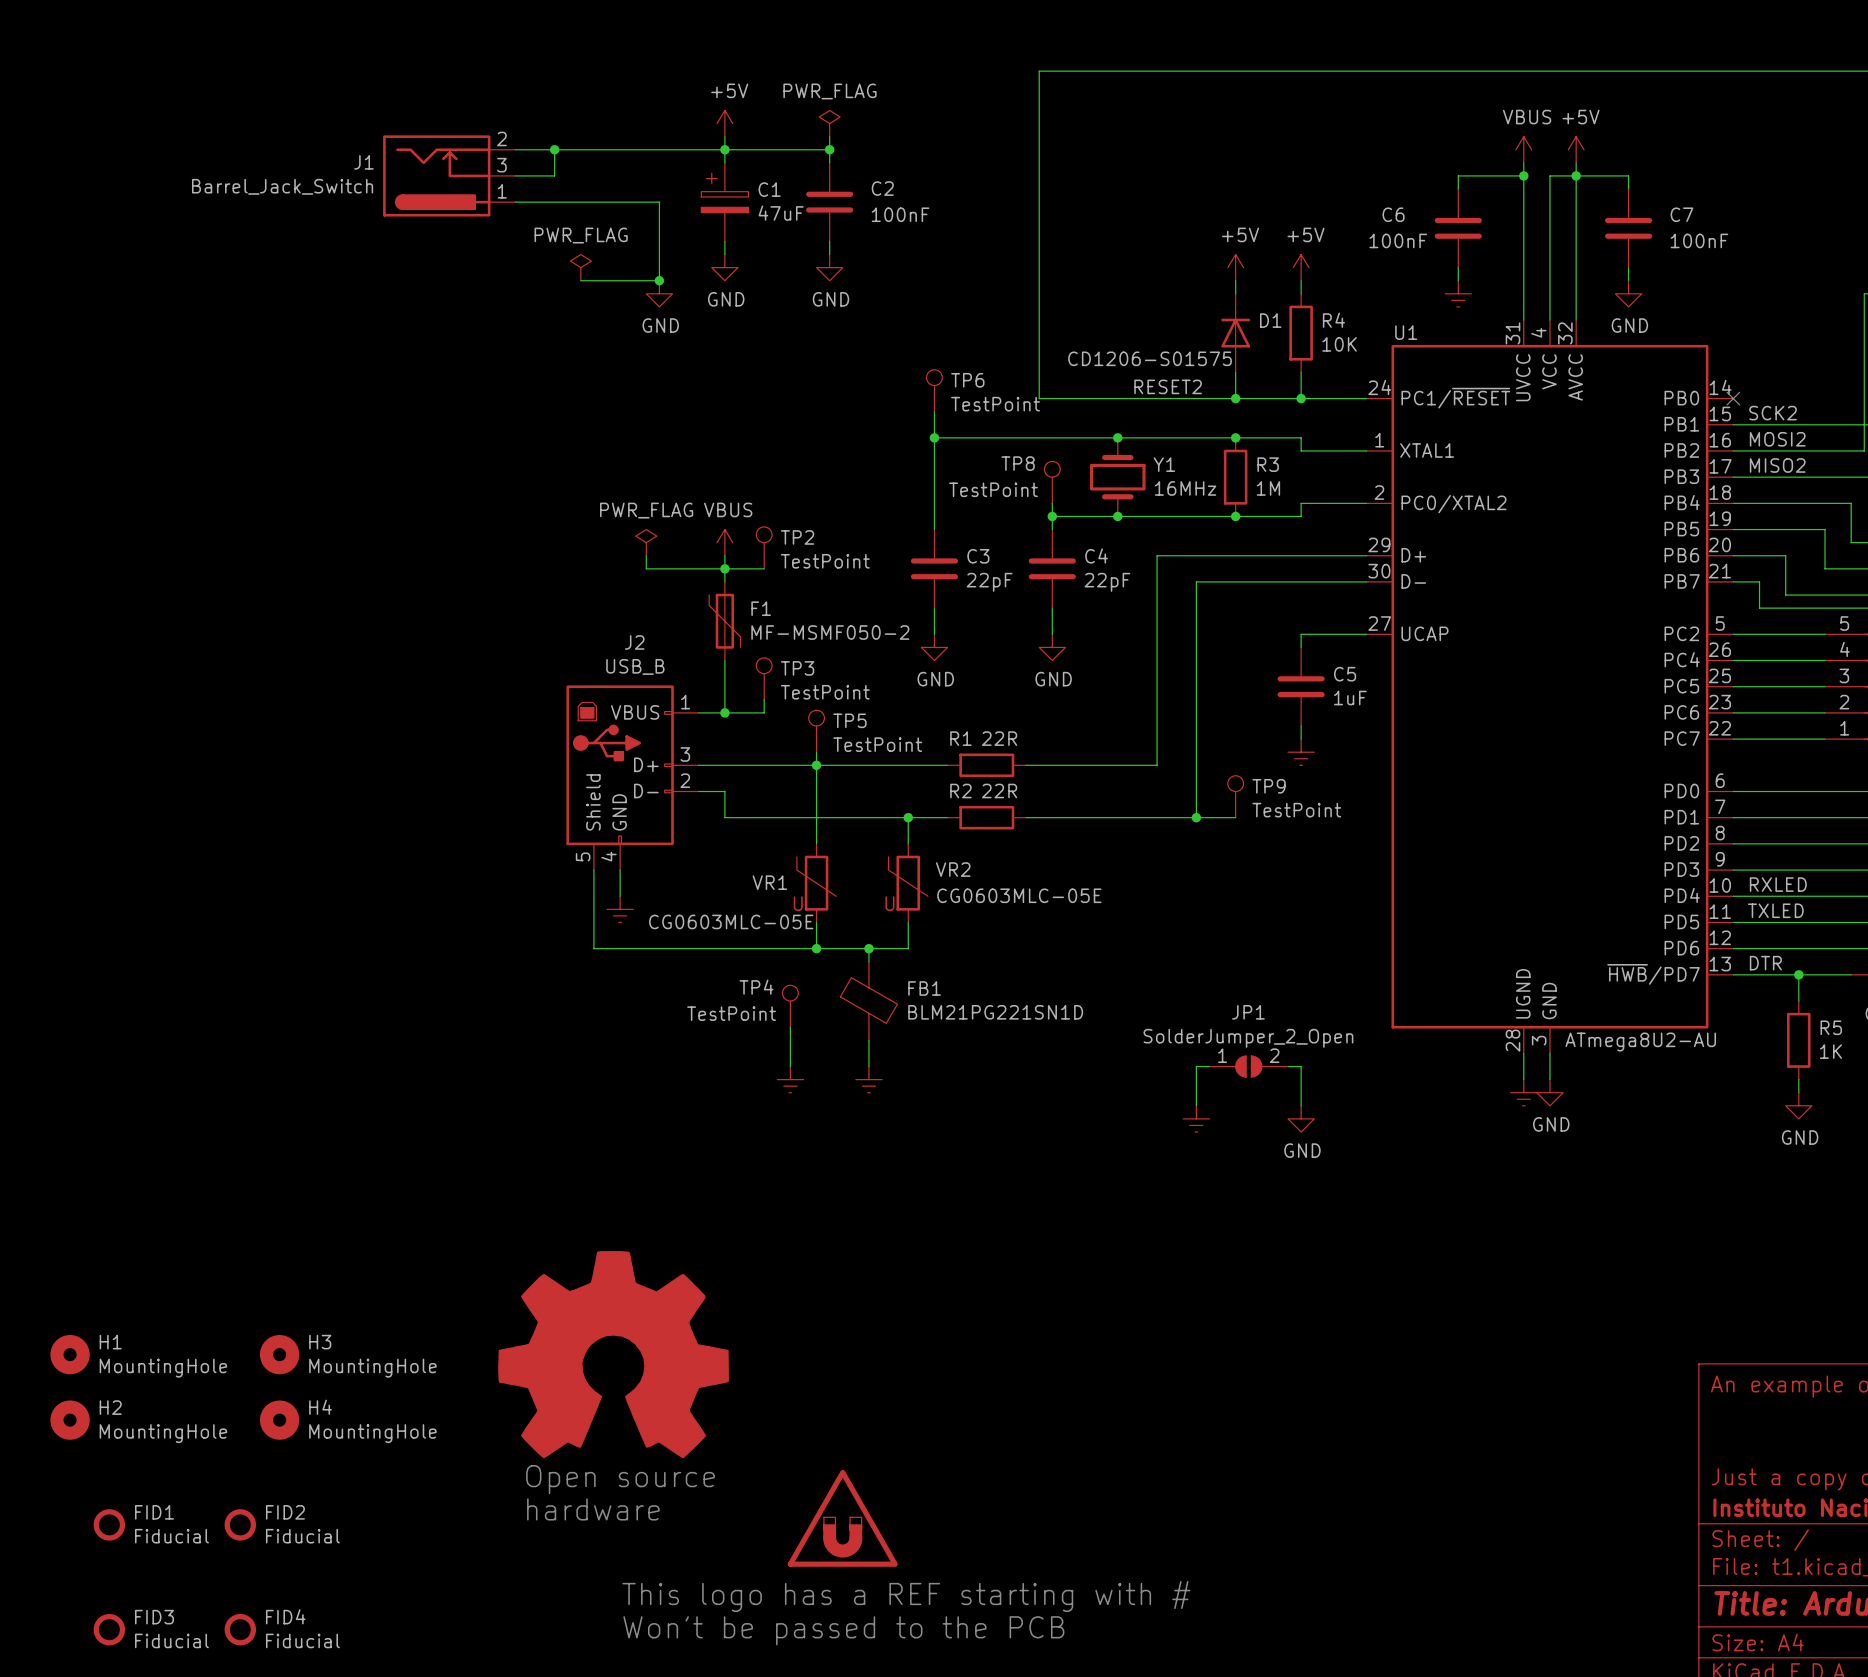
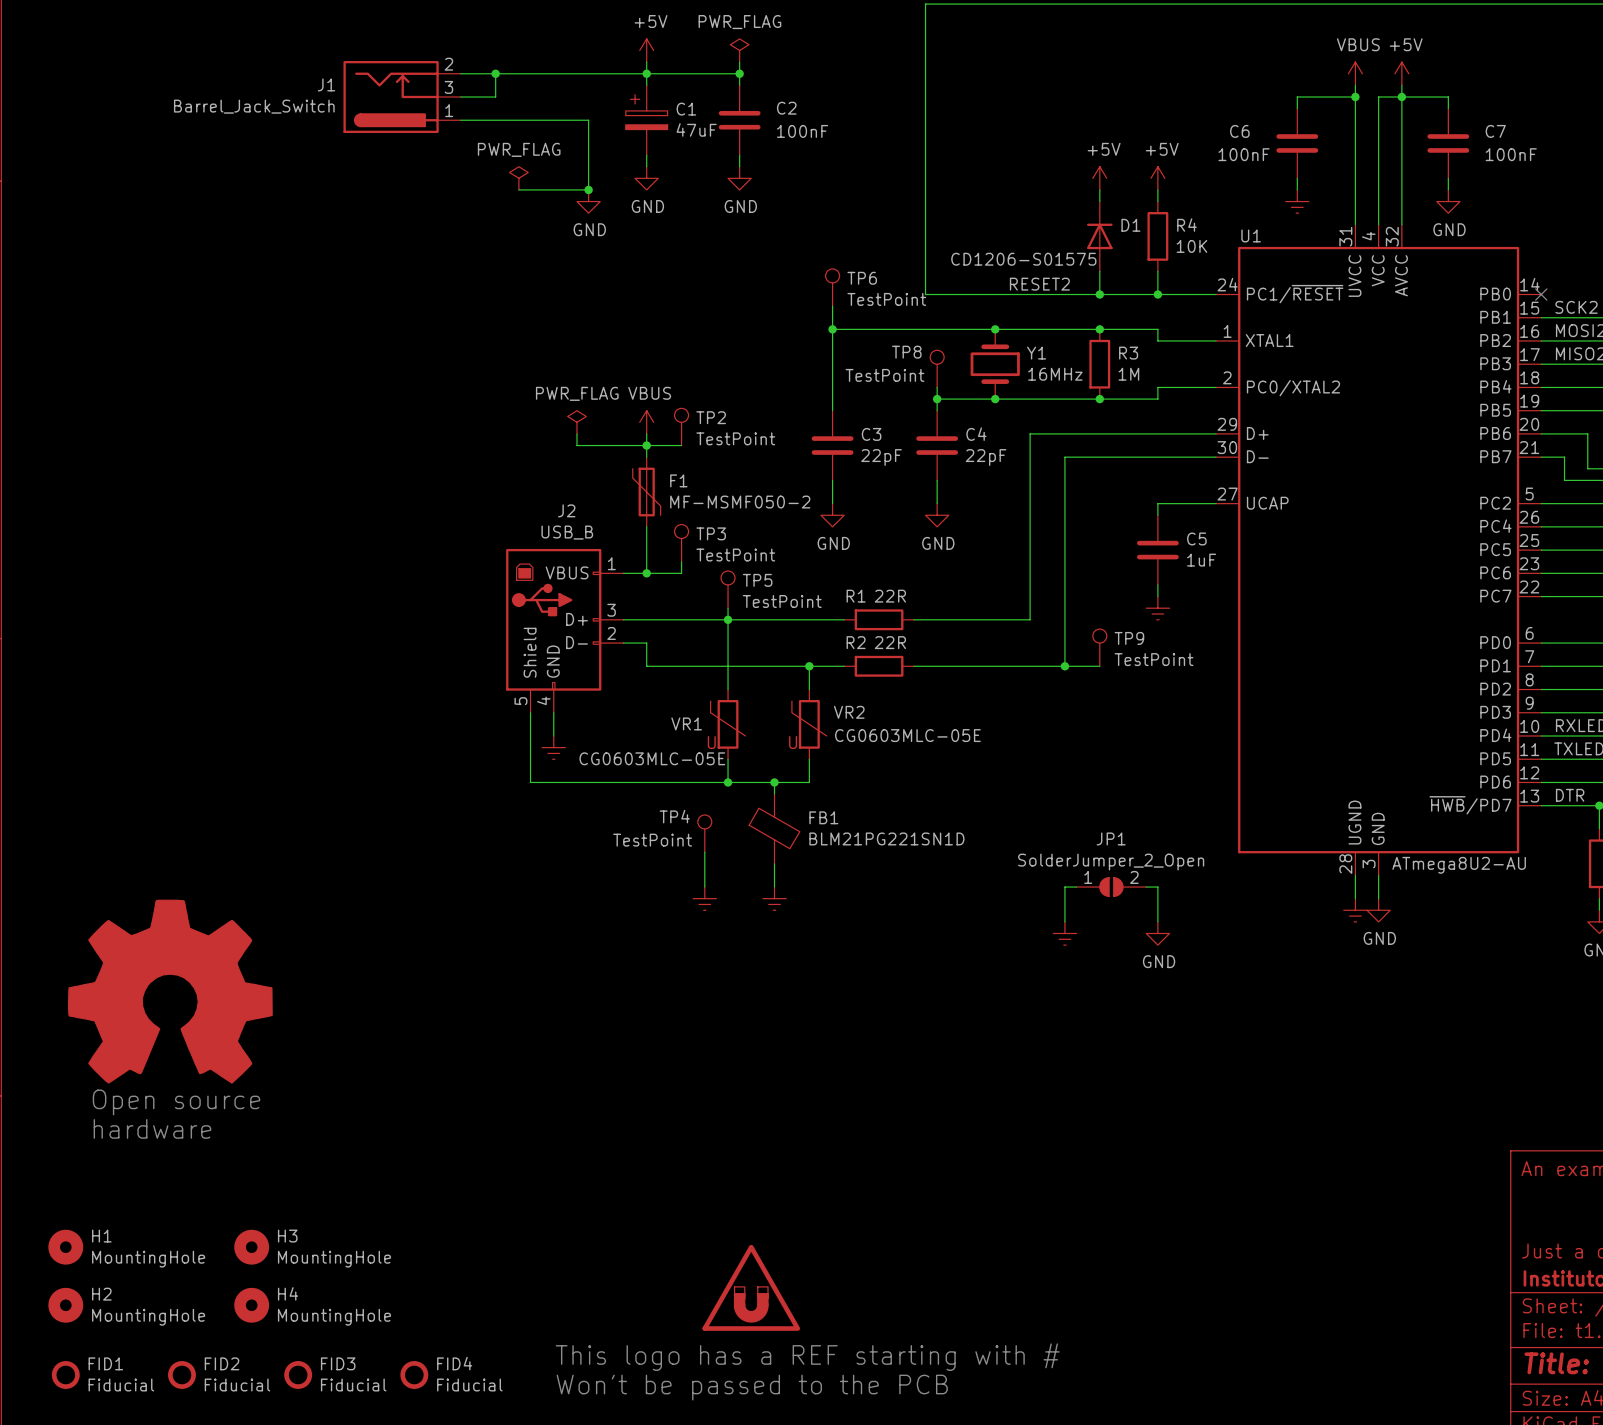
part: none -> (170, 991)
text: none -> Open source (176, 1102)
text: none -> hardware (152, 1128)
H1 position: (70, 1354) -> (65, 1247)
H3 position: (279, 1354) -> (251, 1247)
part: (613, 1354) -> none
H2 position: (70, 1420) -> (65, 1305)
H4 position: (279, 1420) -> (251, 1305)
text: Open source (620, 1479) -> none
text: hardware (593, 1509) -> none
FID1 position: (109, 1524) -> (65, 1374)
FID2 position: (240, 1524) -> (181, 1374)
FID3 position: (109, 1629) -> (298, 1374)
FID4 position: (240, 1629) -> (414, 1374)

